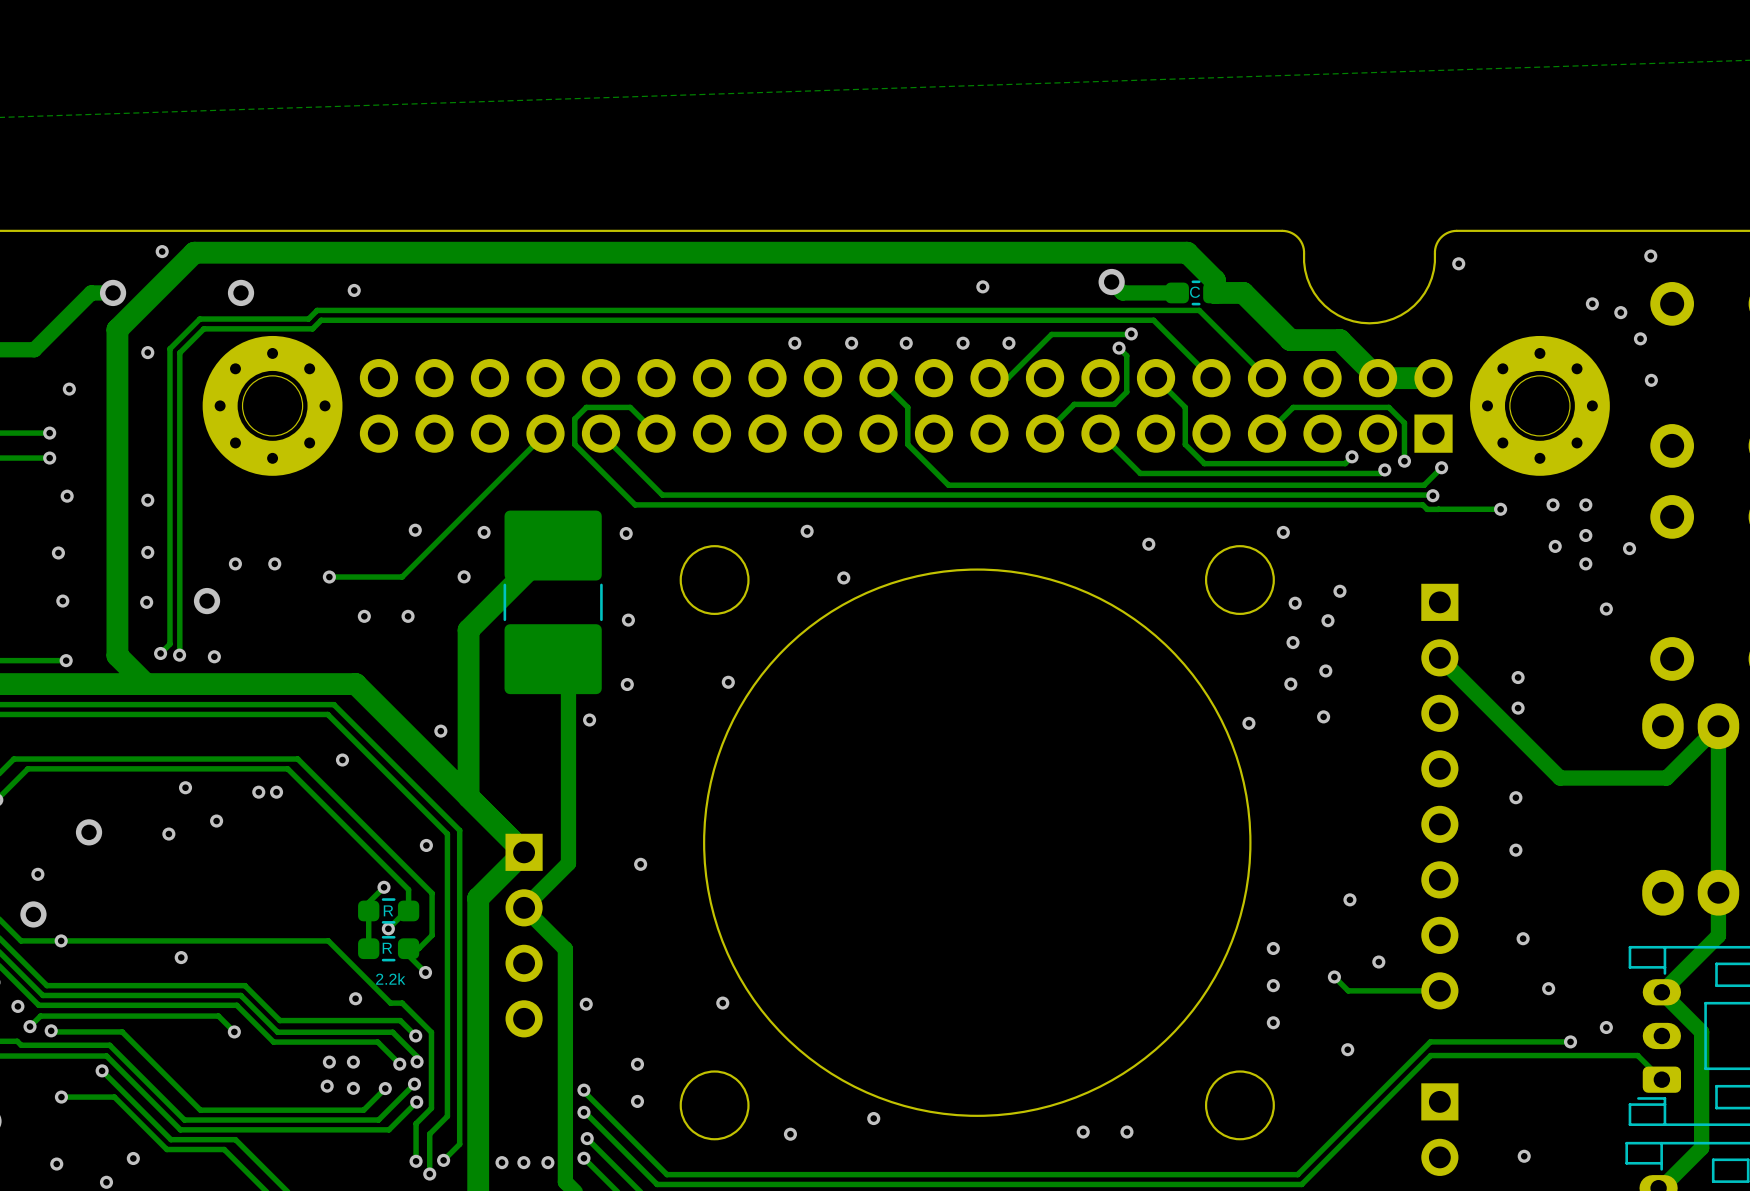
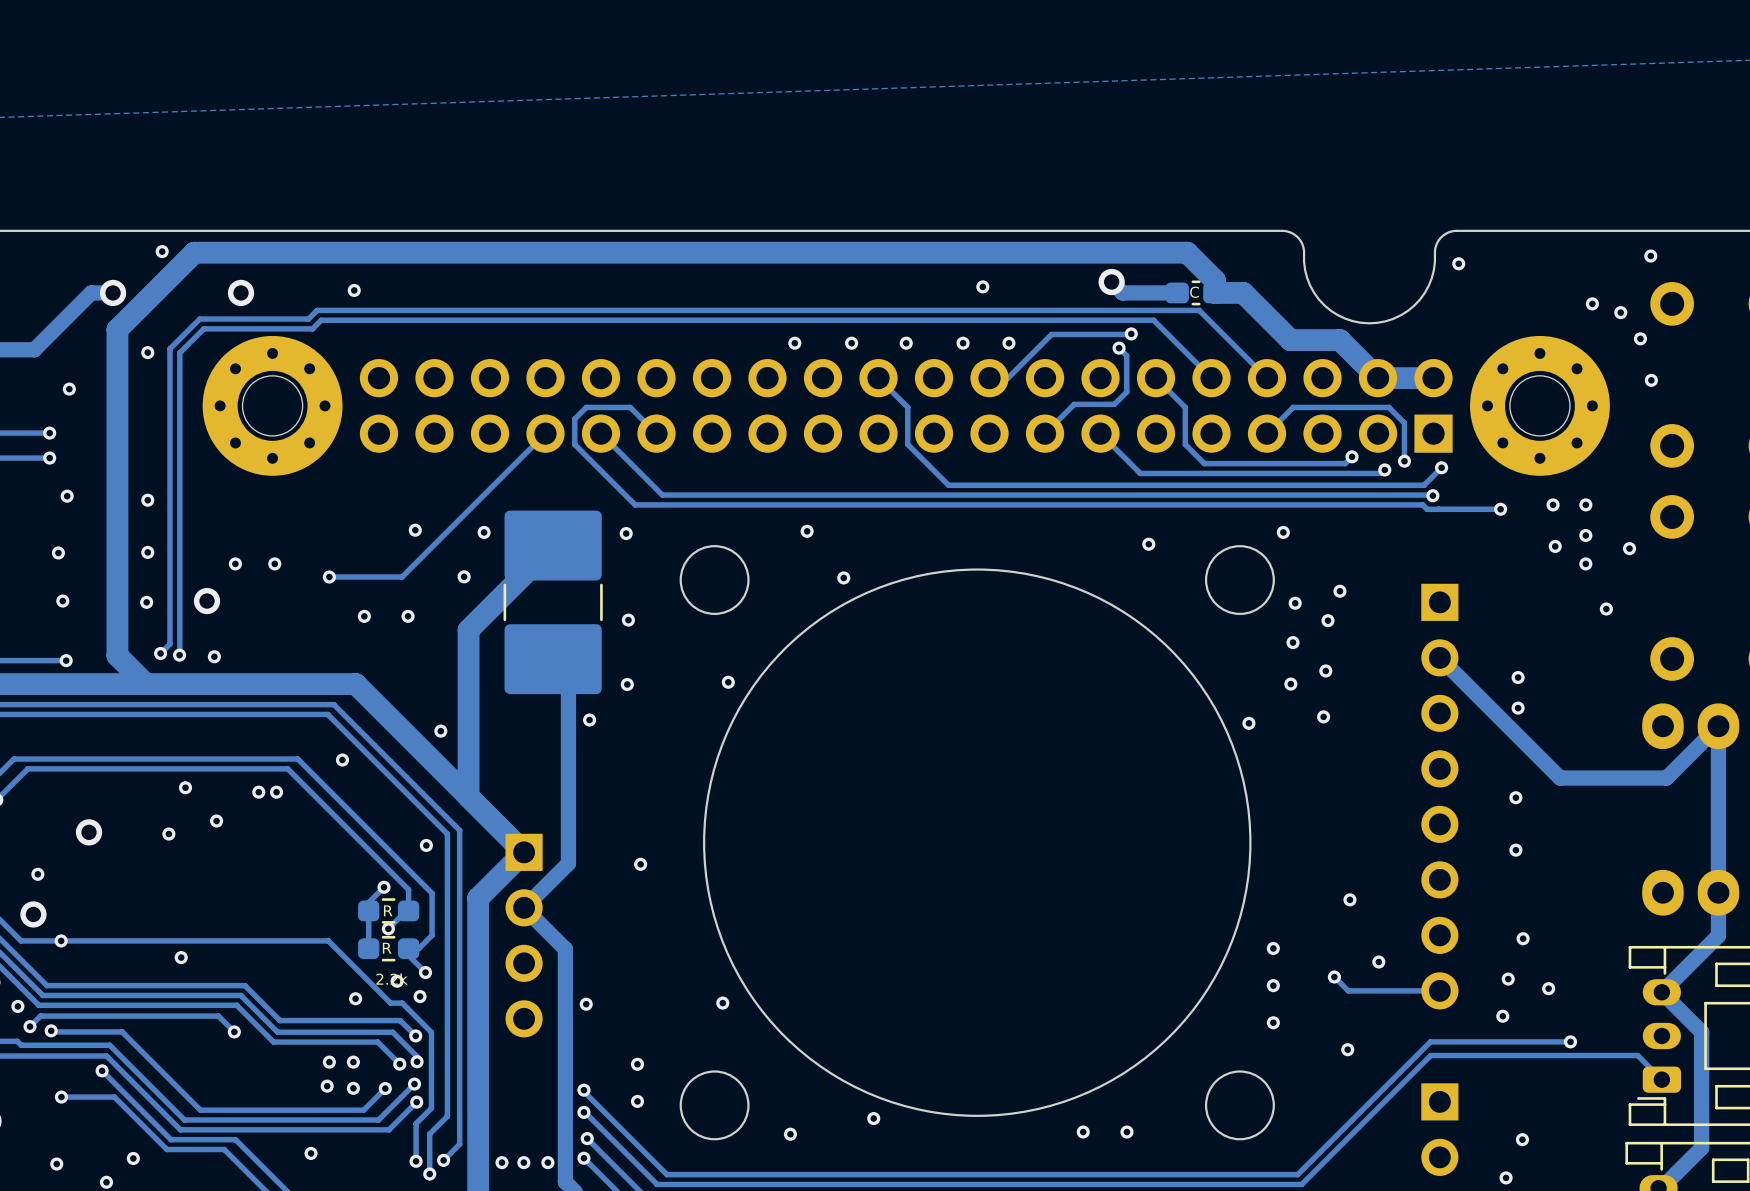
via: none -> (1508, 979)
via: none -> (397, 981)
via: none -> (420, 996)
via: none -> (1502, 1016)
via: (1606, 1027) -> none
via: none -> (1522, 1139)
via: none -> (311, 1153)
via: (1524, 1156) -> none
via: none -> (1506, 1177)

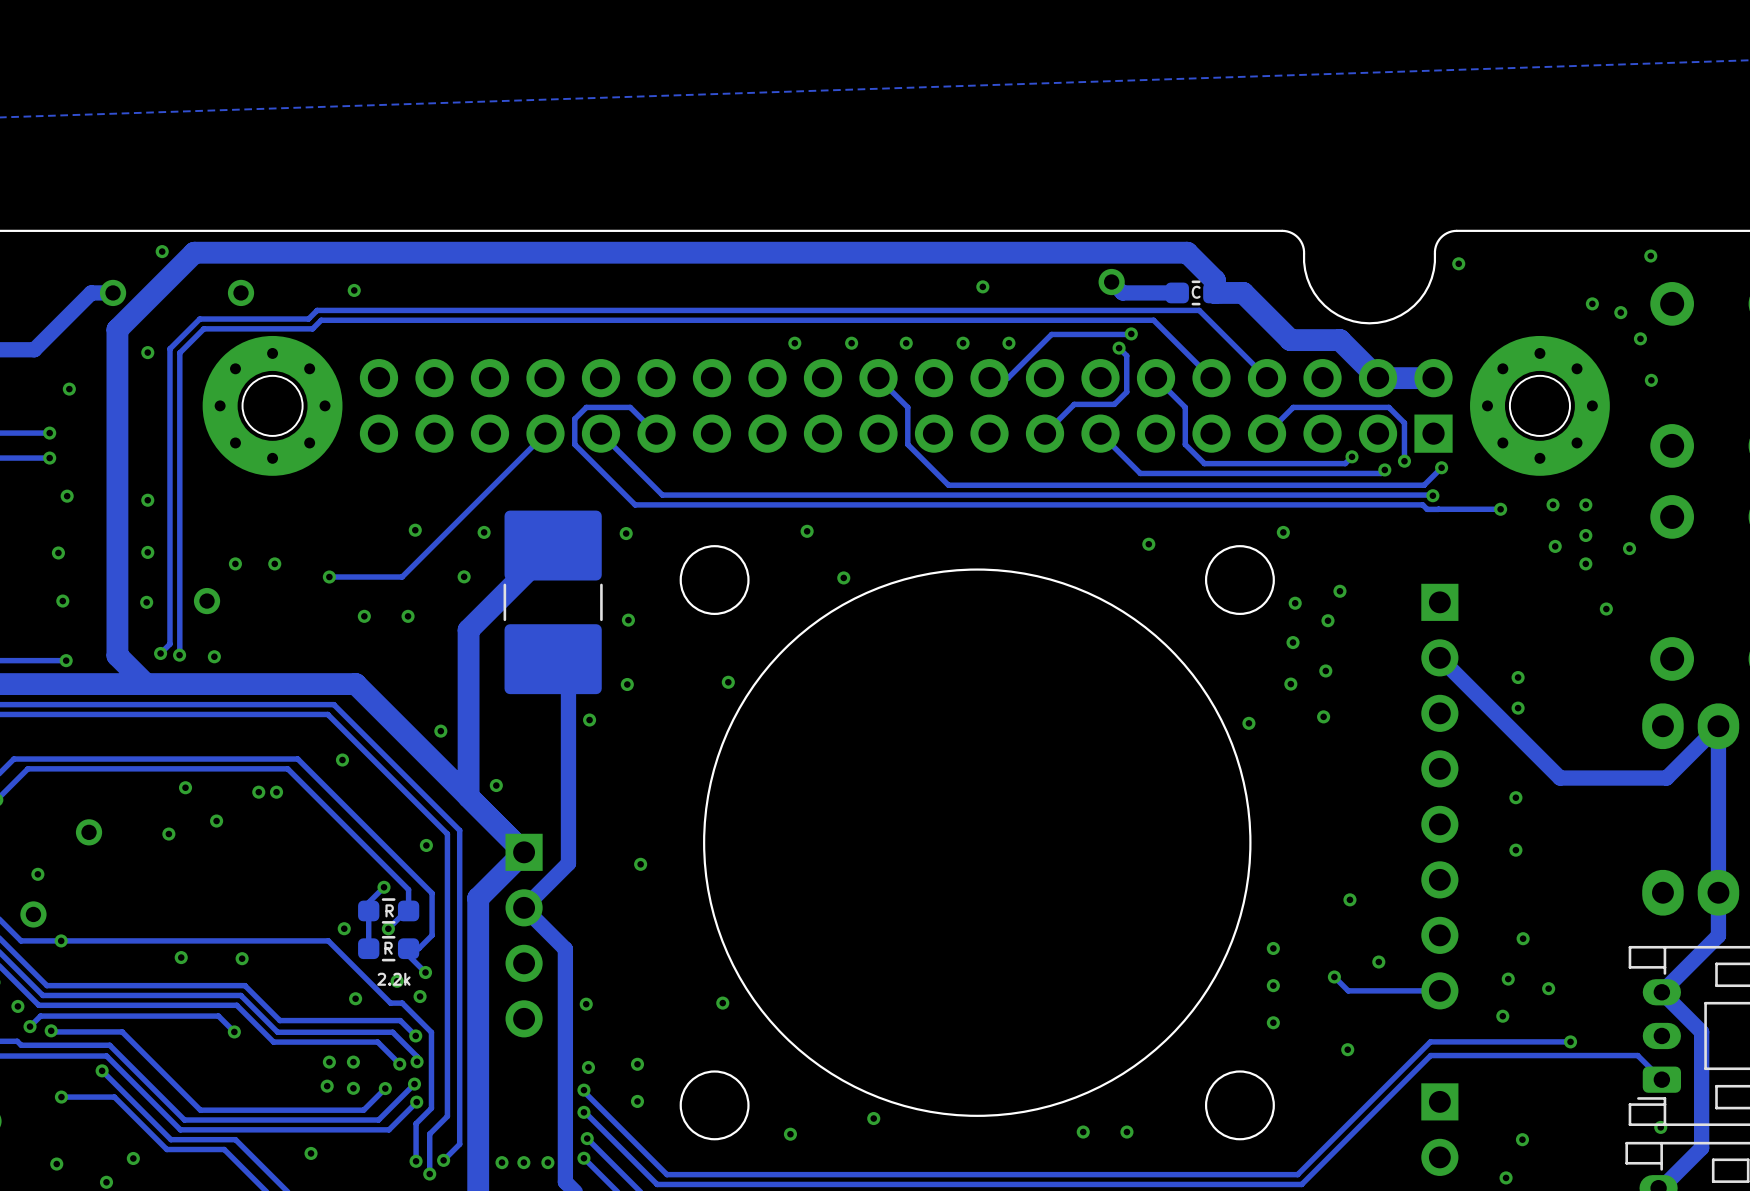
via: none -> (496, 785)
via: none -> (344, 928)
via: none -> (242, 958)
via: none -> (588, 1067)
via: none -> (1660, 1127)

